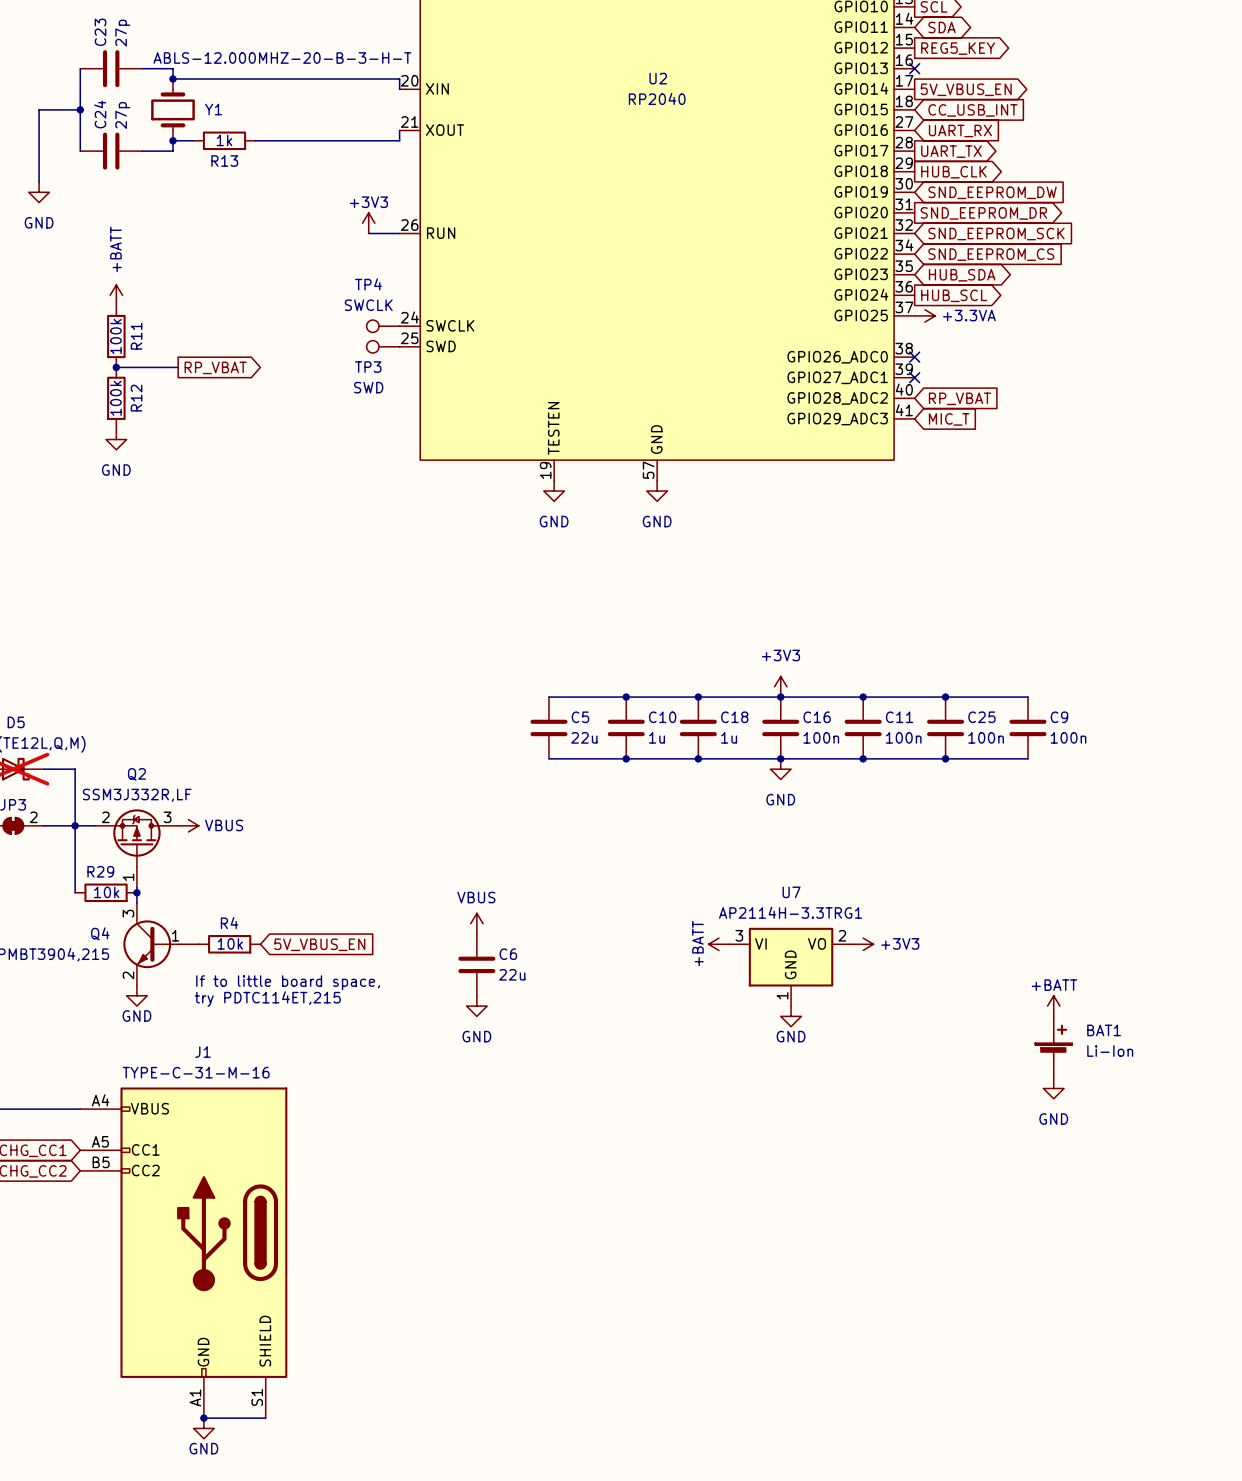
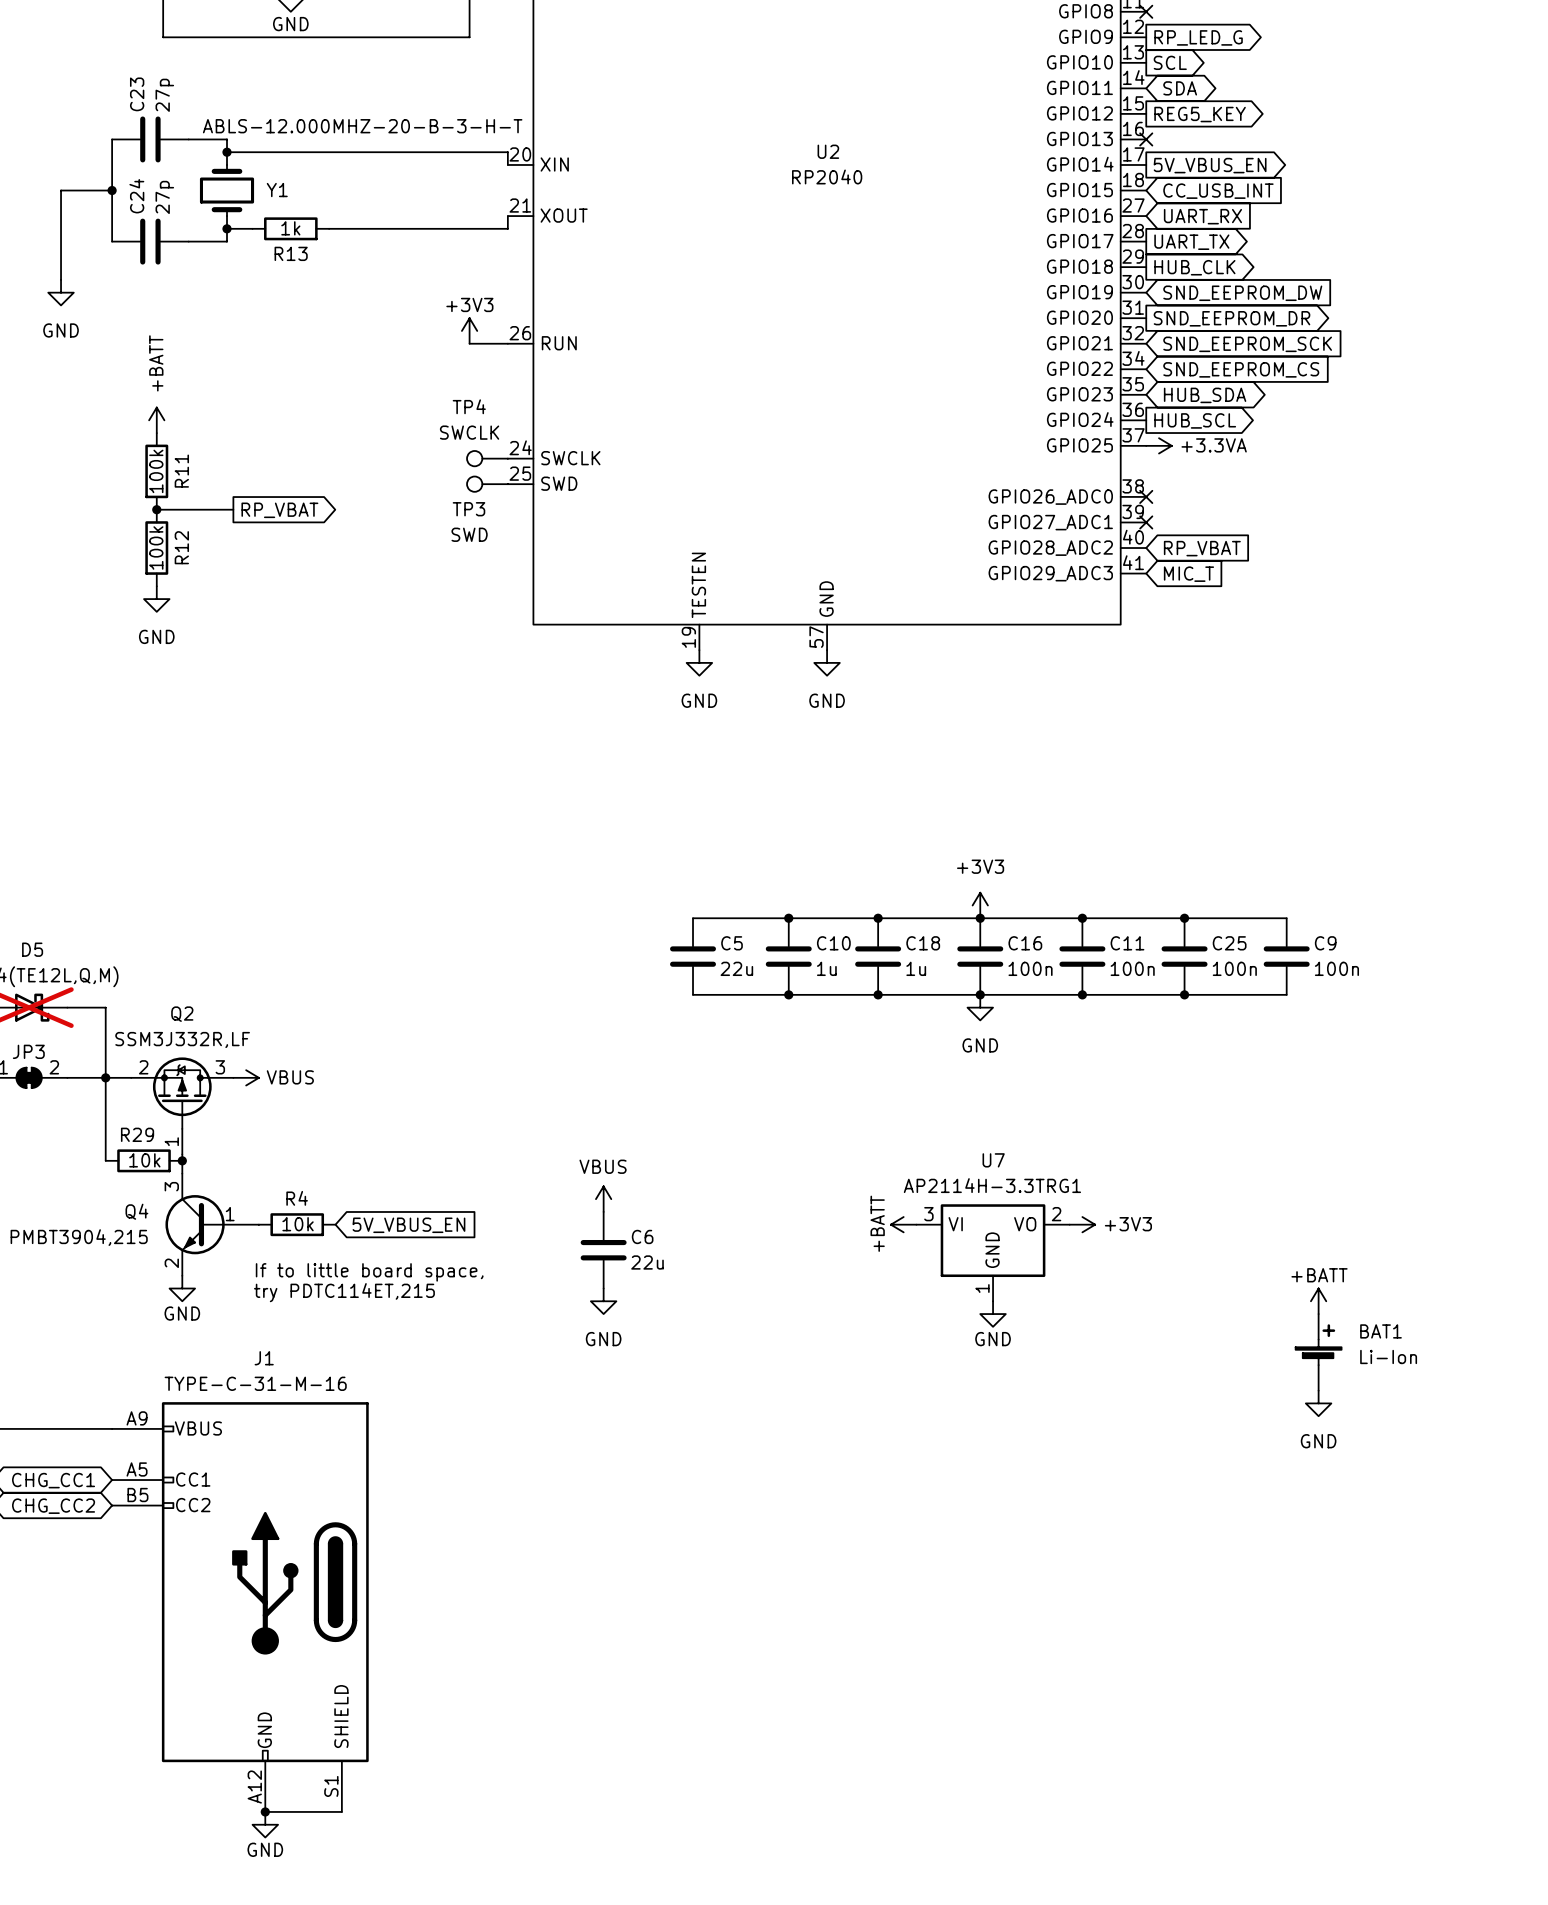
J1 pin number: A4 (100, 1100) -> A9 (137, 1418)
J1 pin number: A1 (195, 1398) -> A12 (254, 1787)

